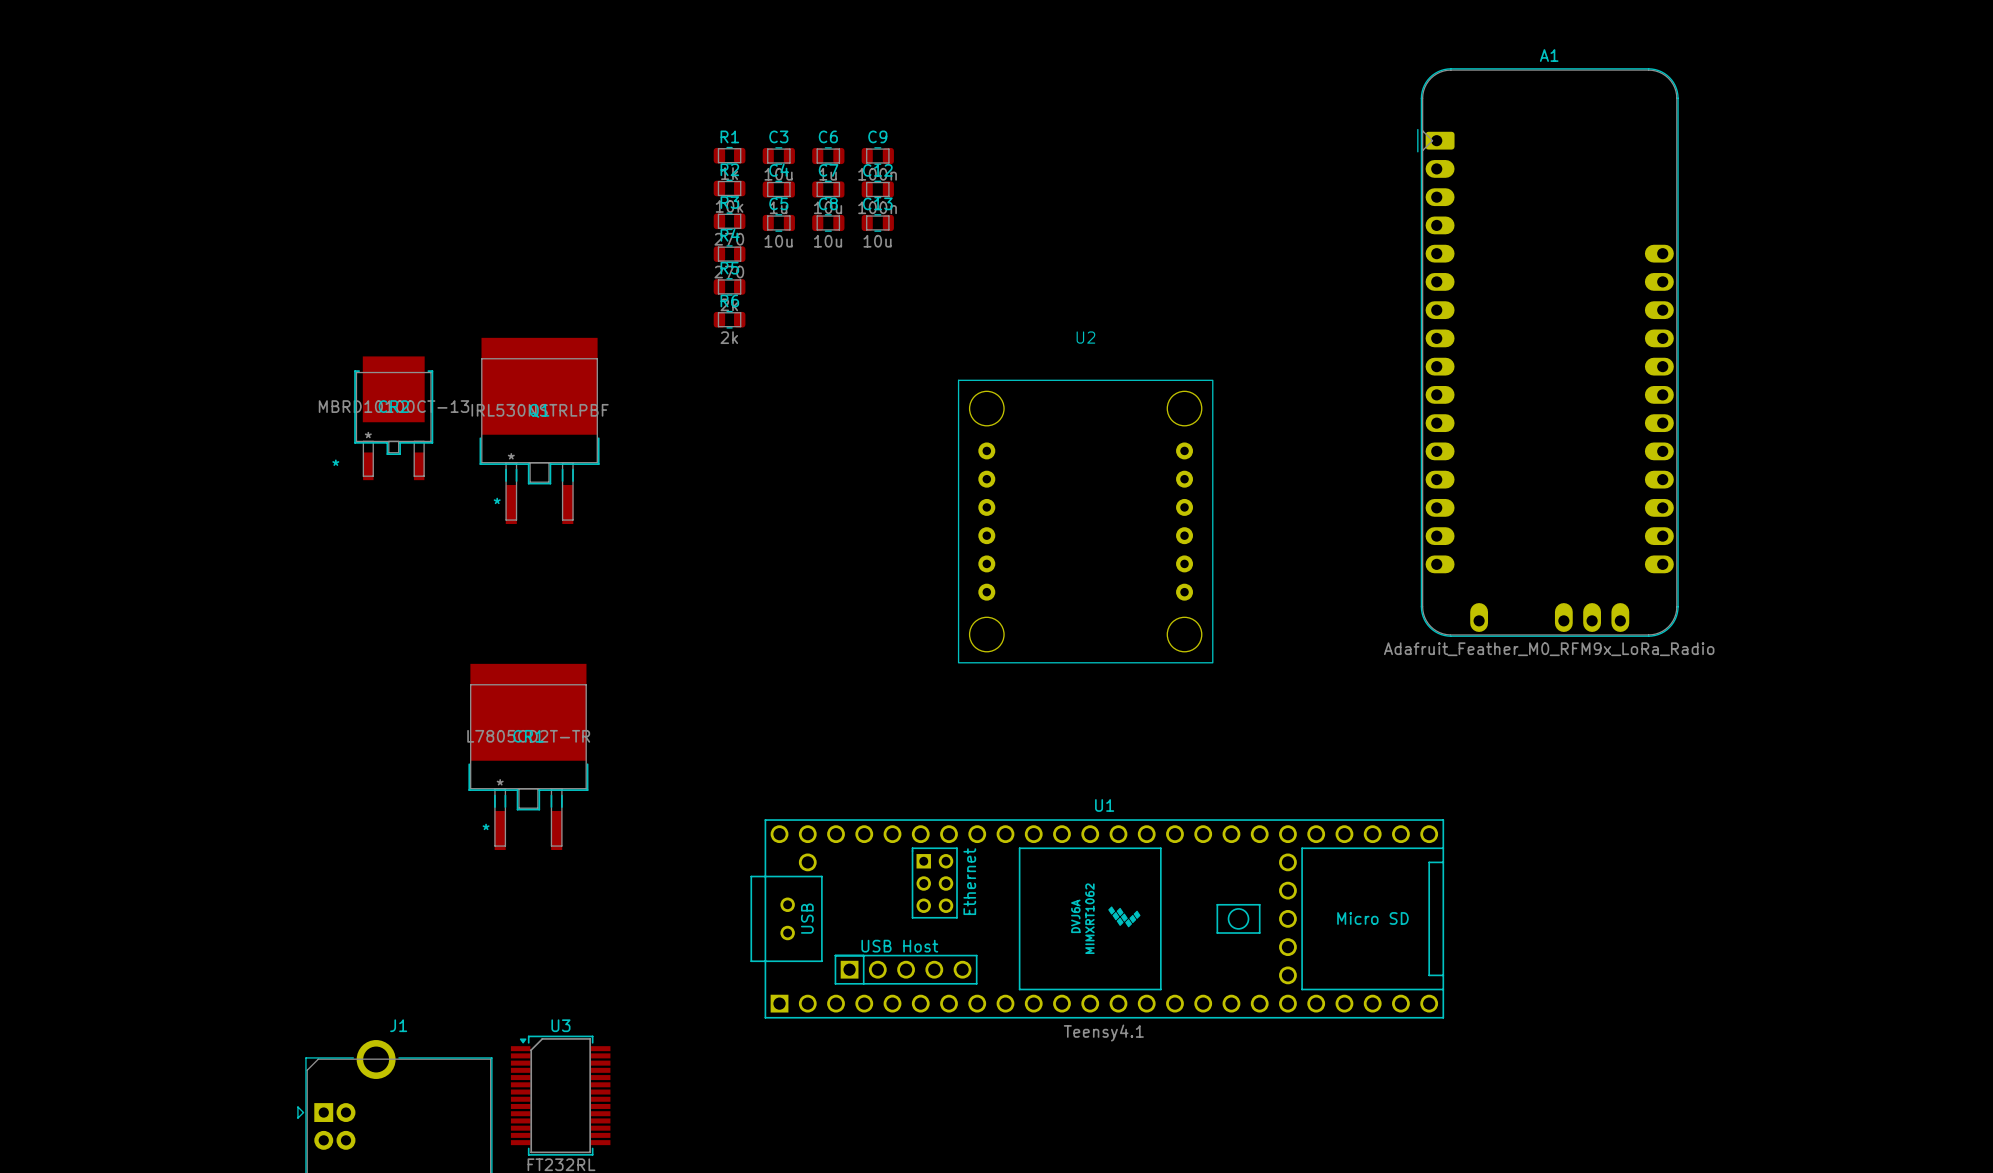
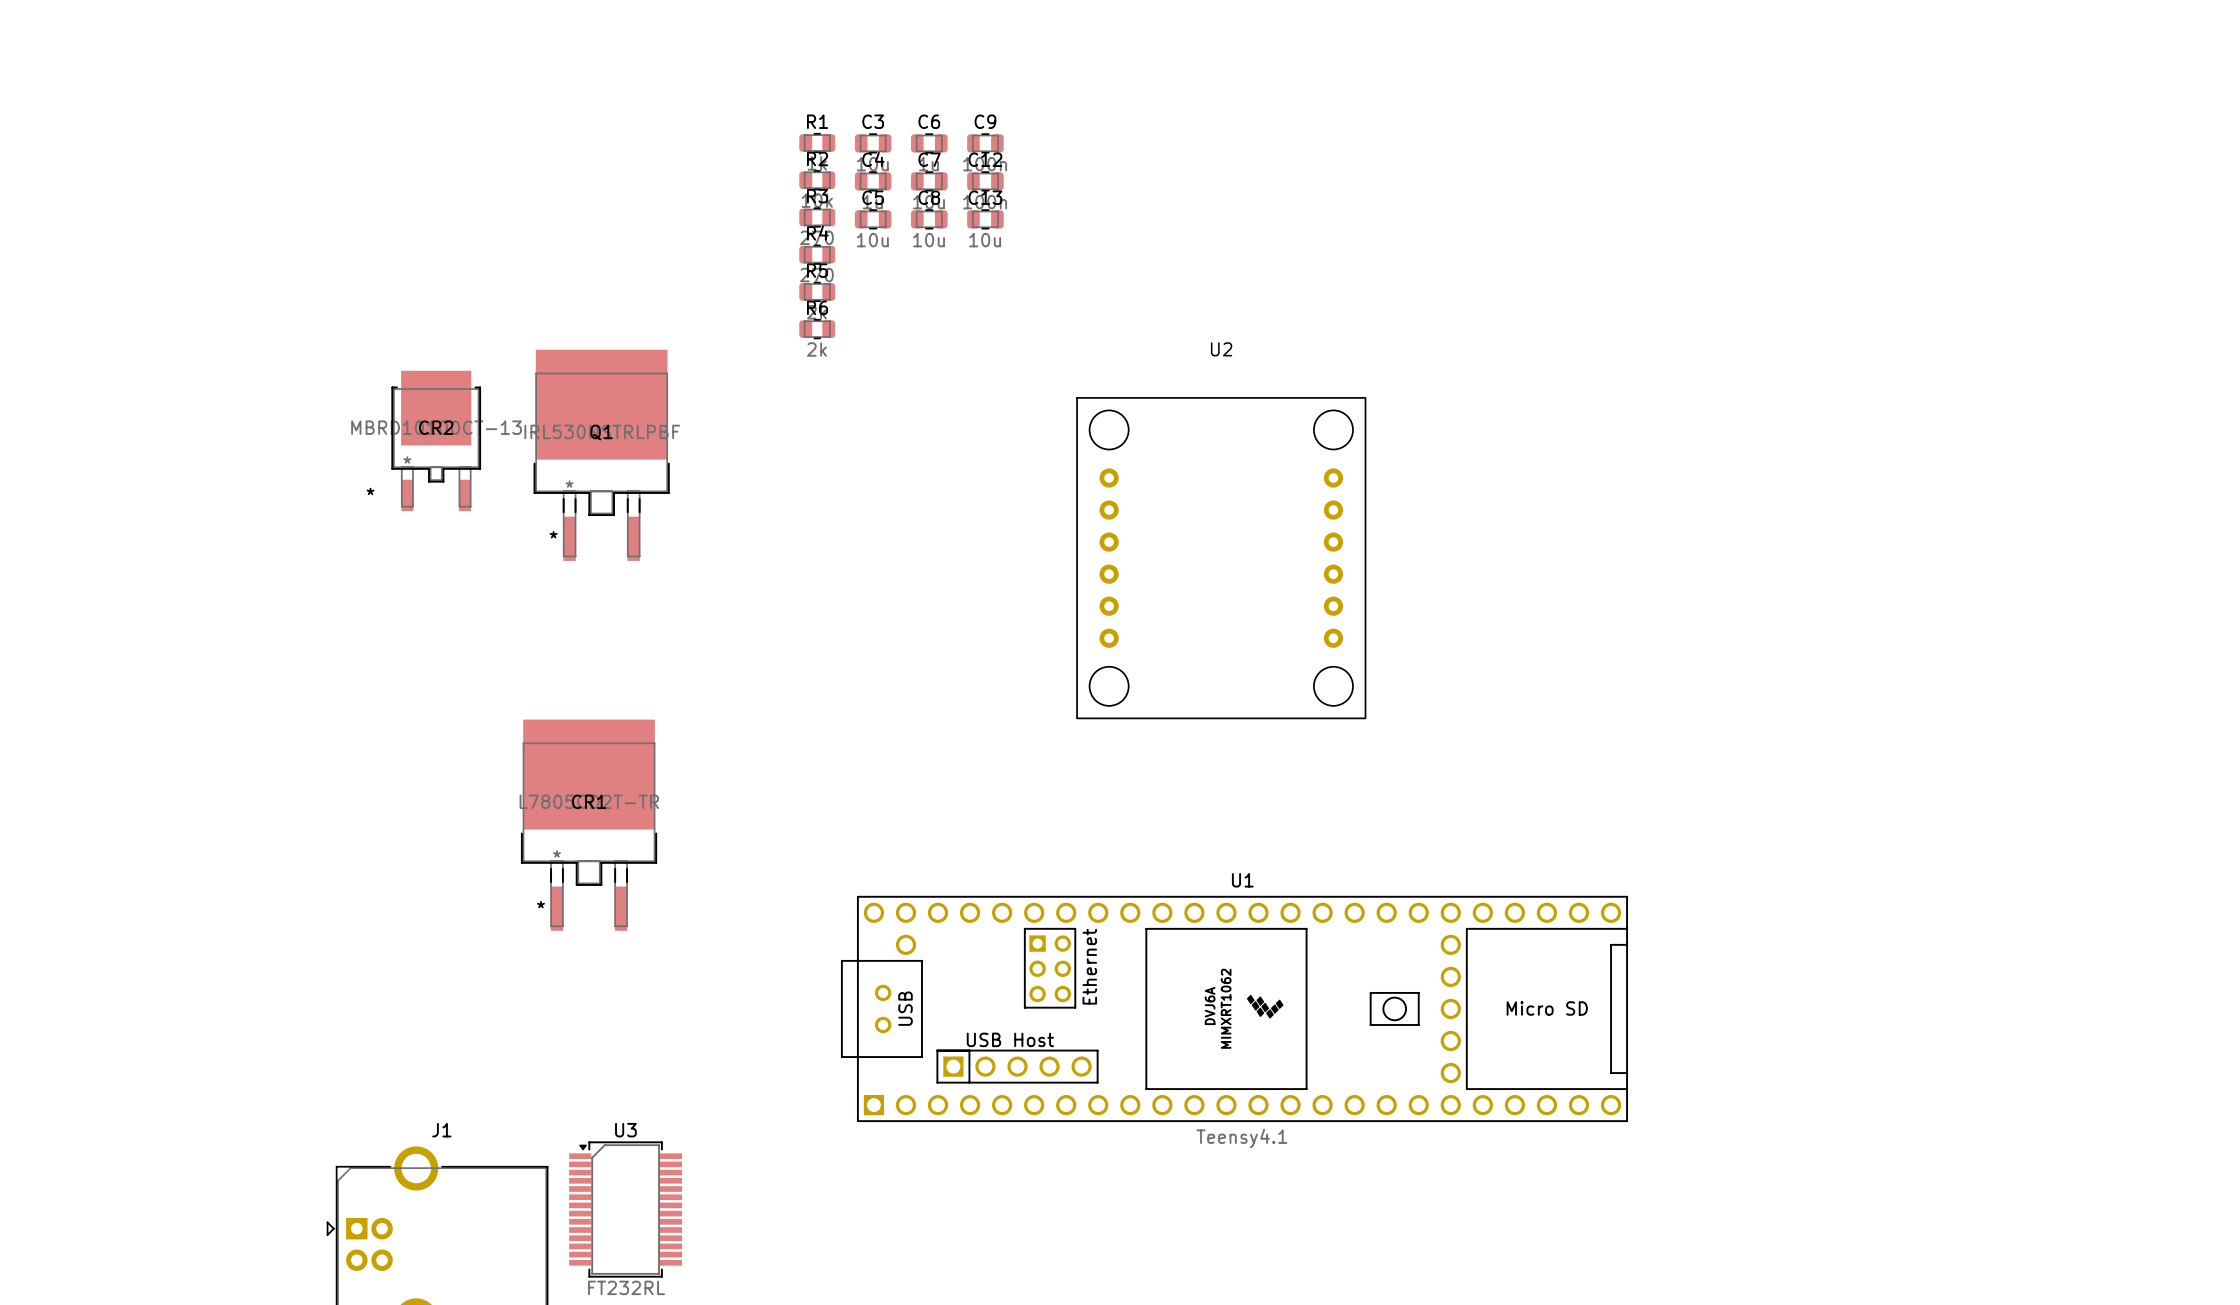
A1: Adafruit_Feather_M0_RFM9x_LoRa_Radio (1547, 352) -> none

